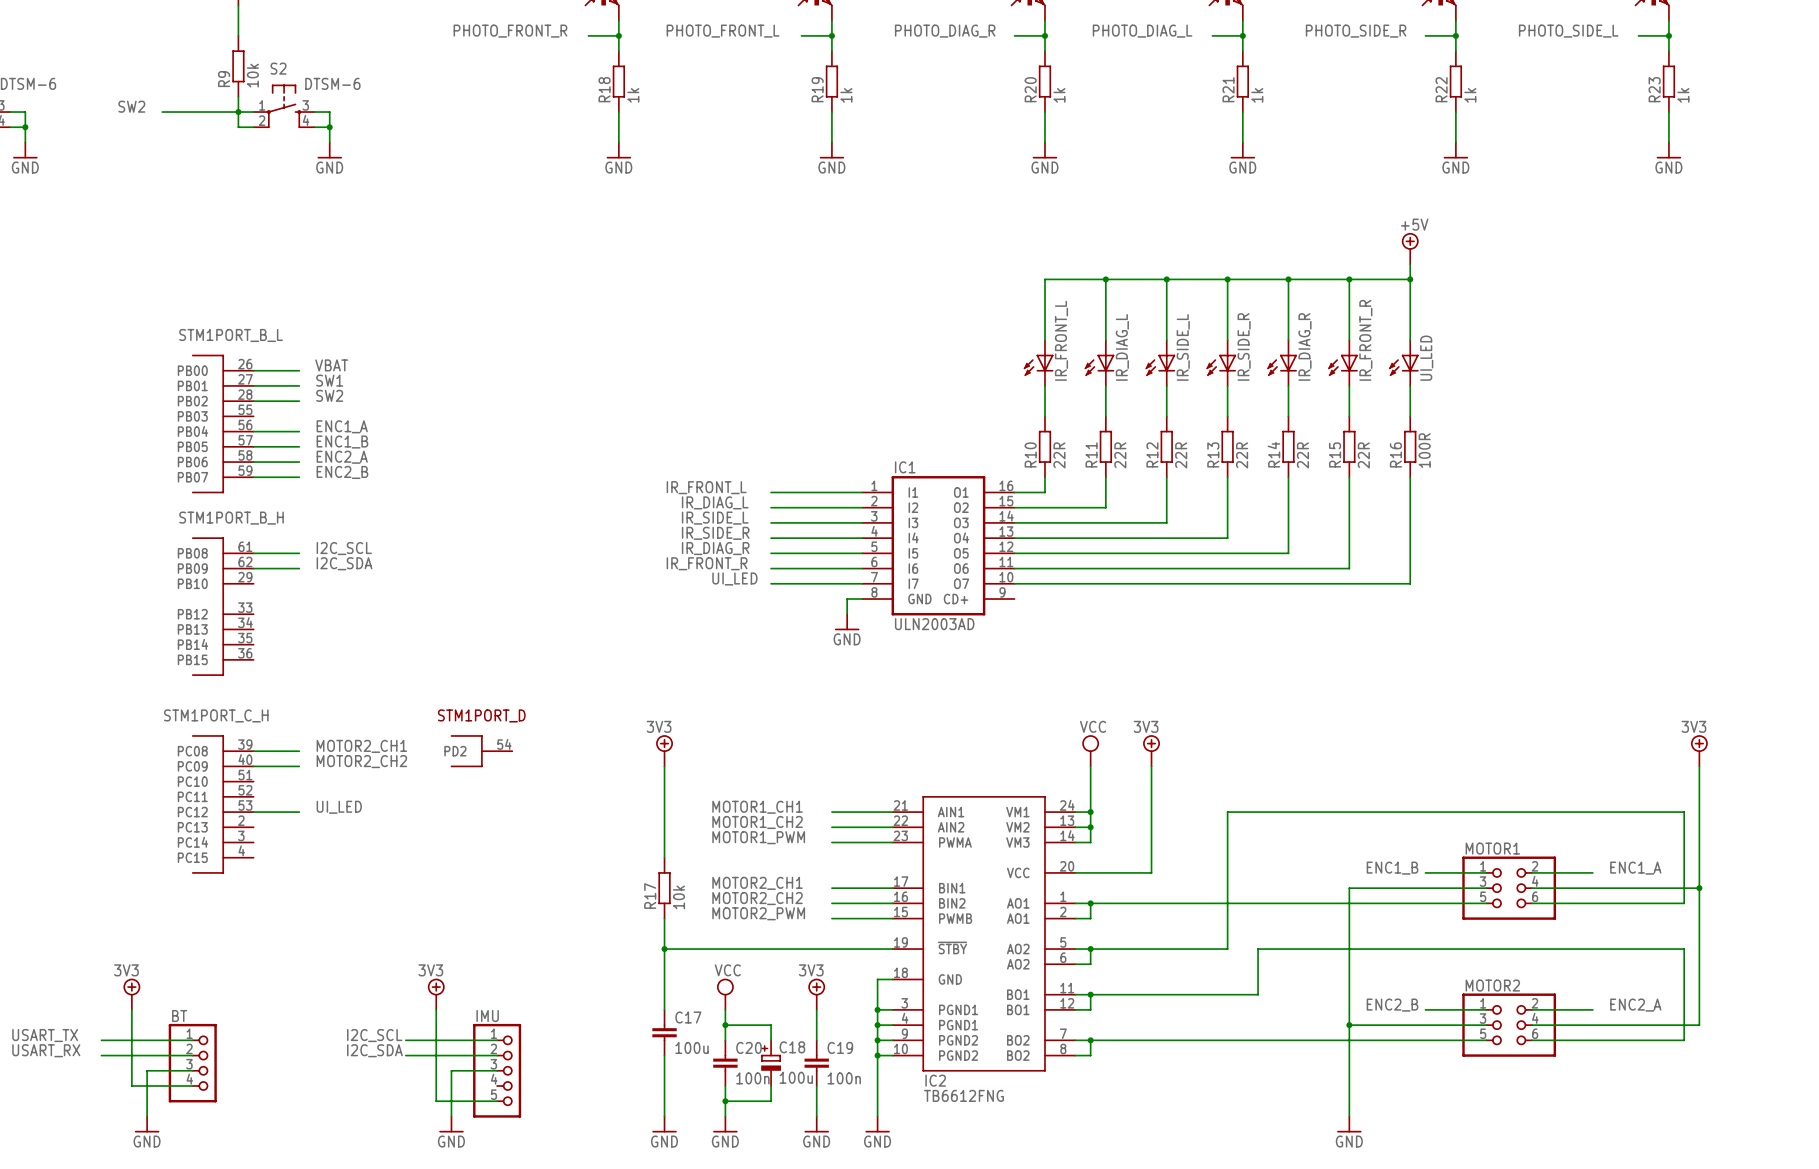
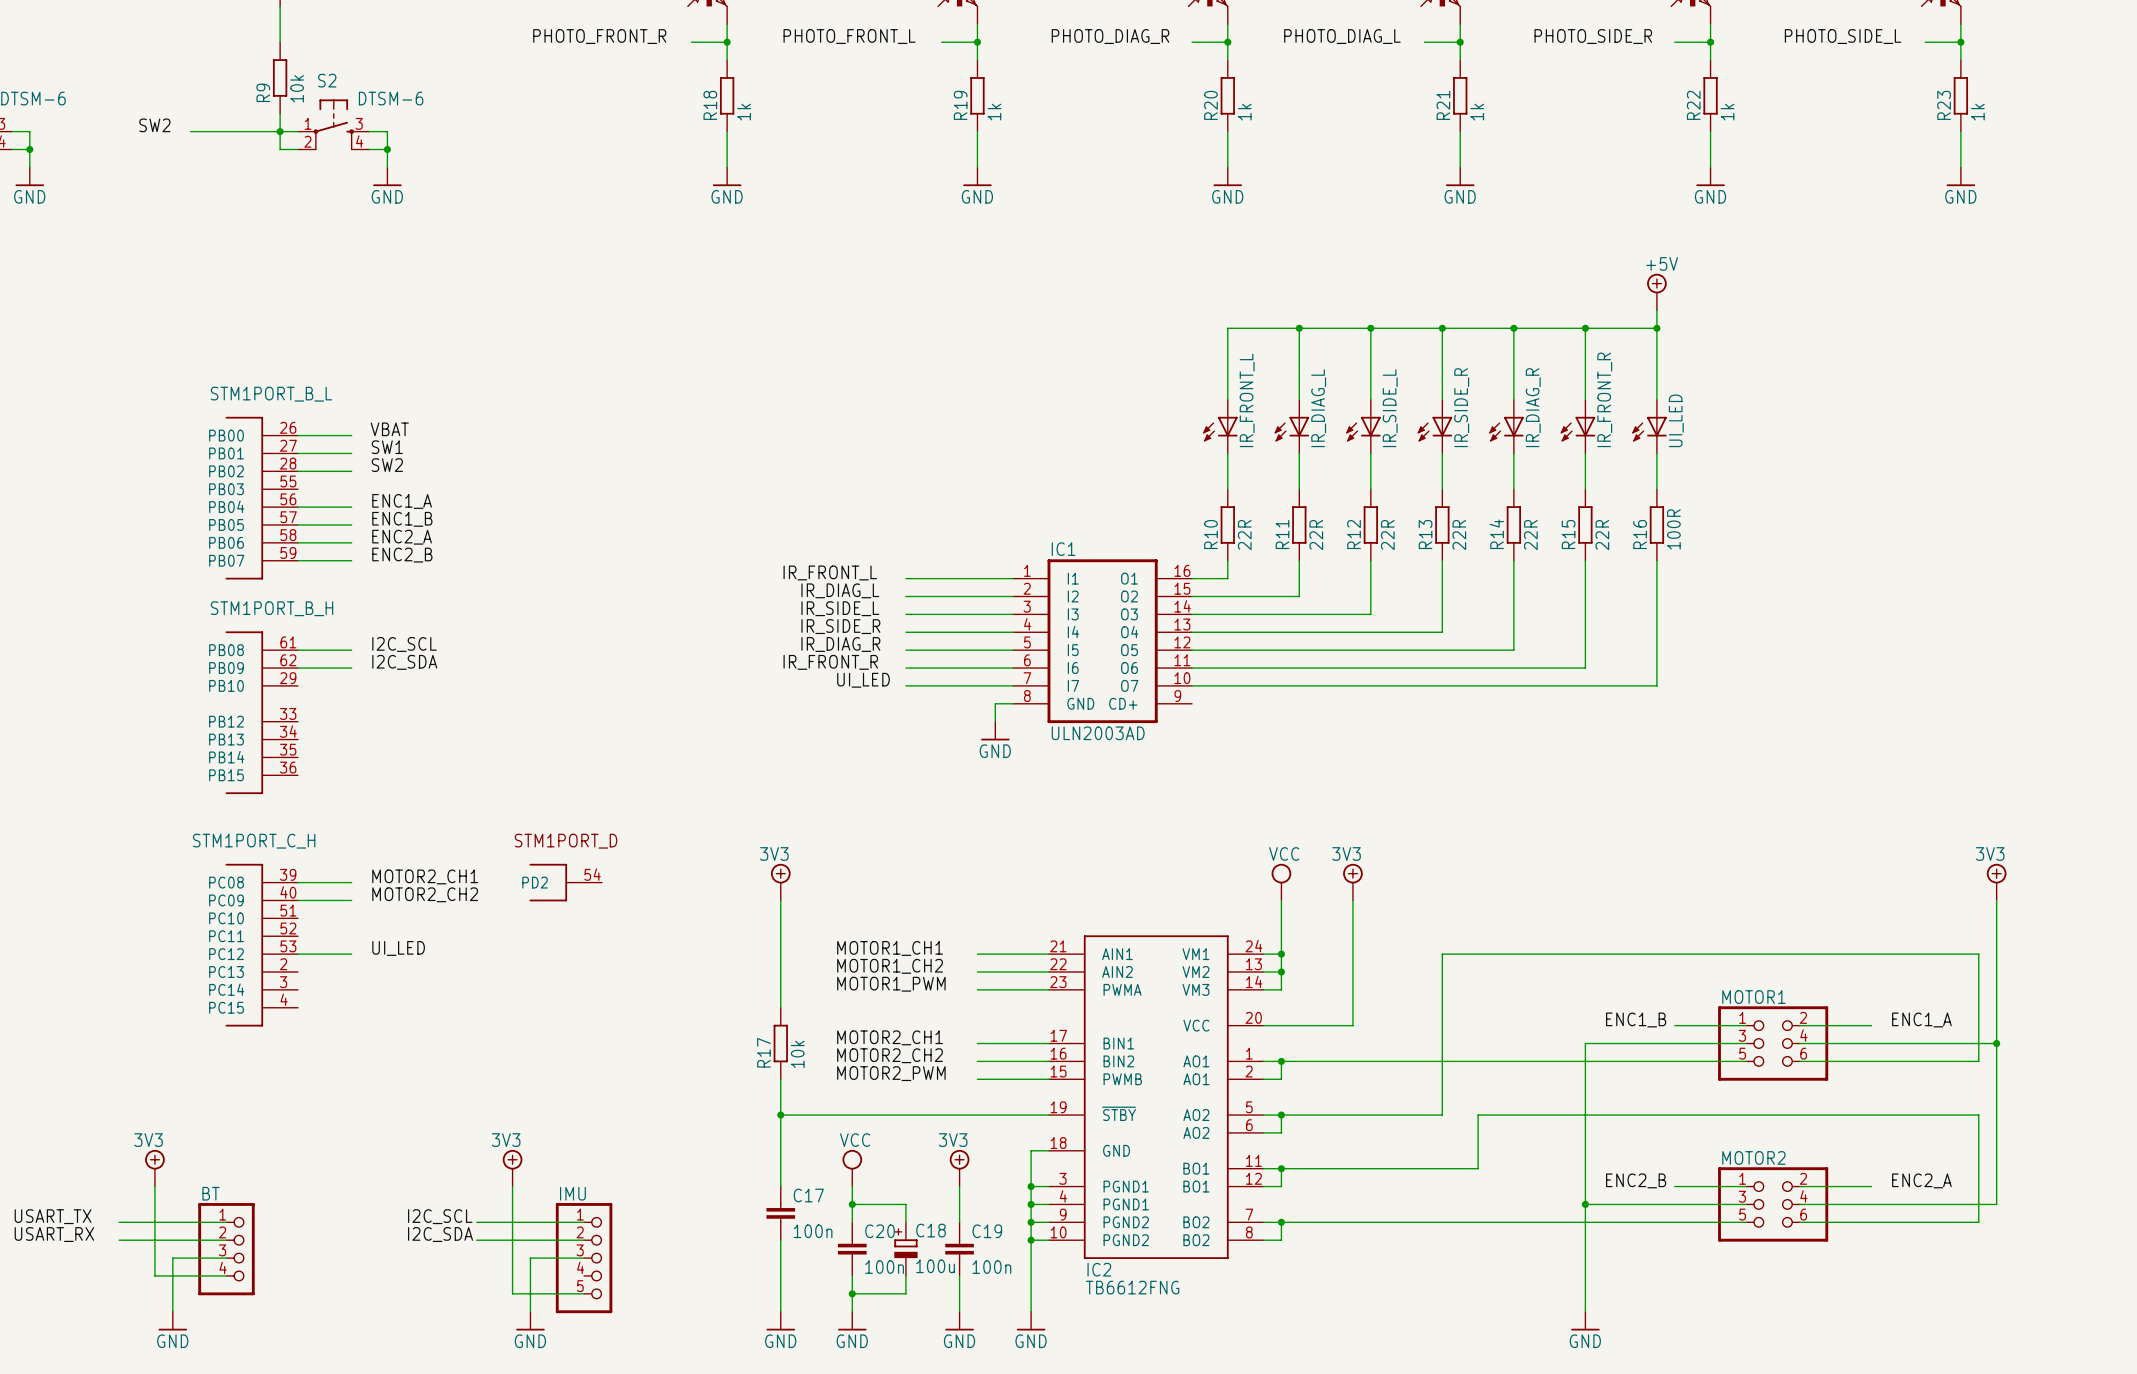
C17 value: 100u (692, 1047) -> 100n (813, 1231)

